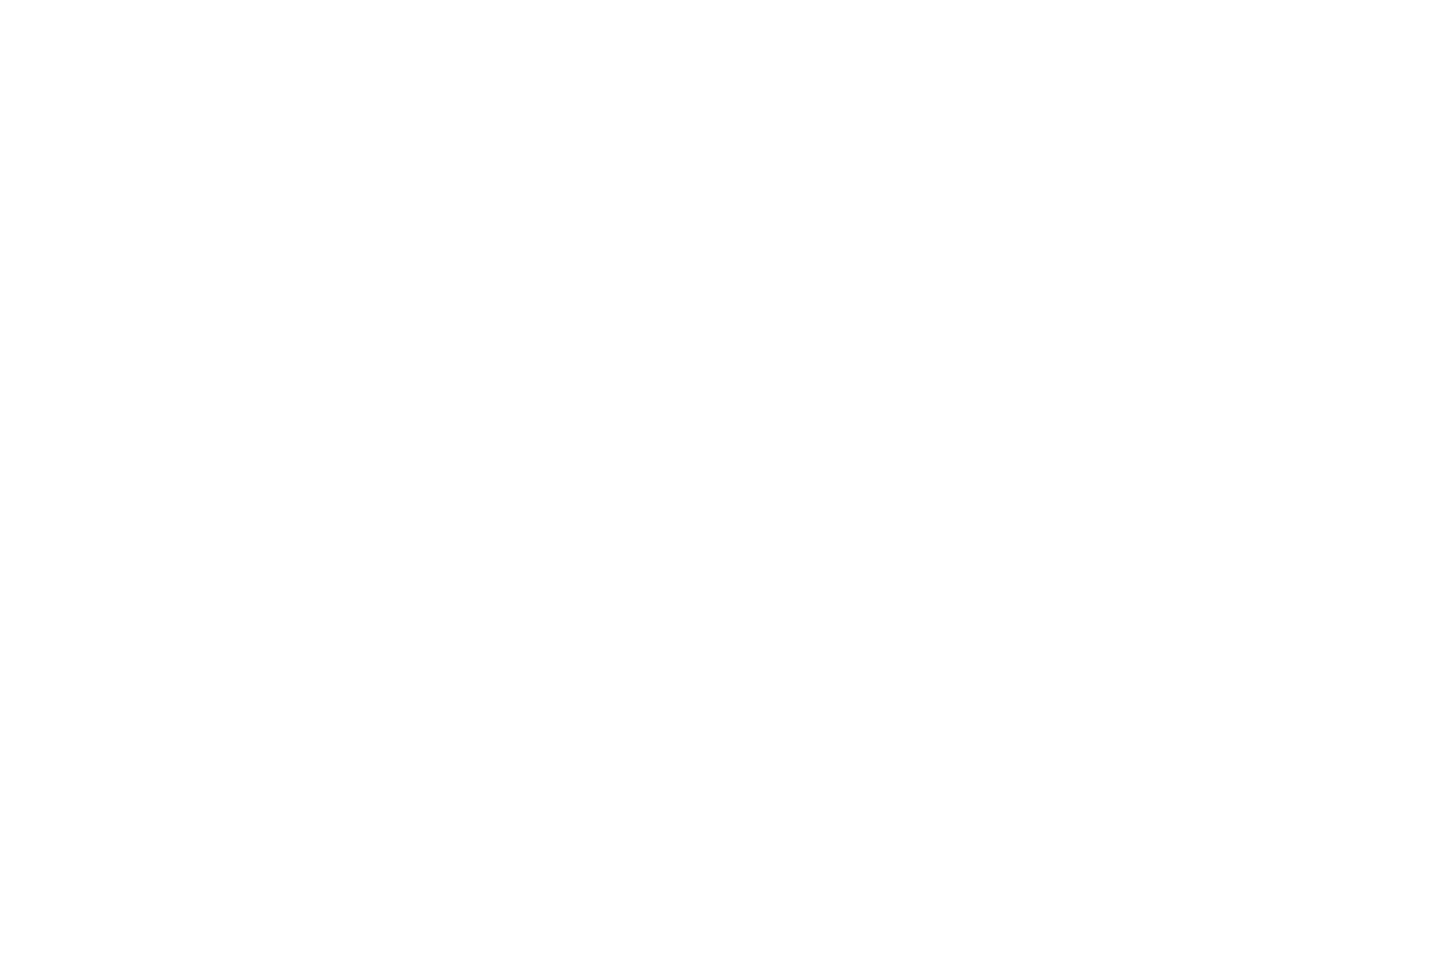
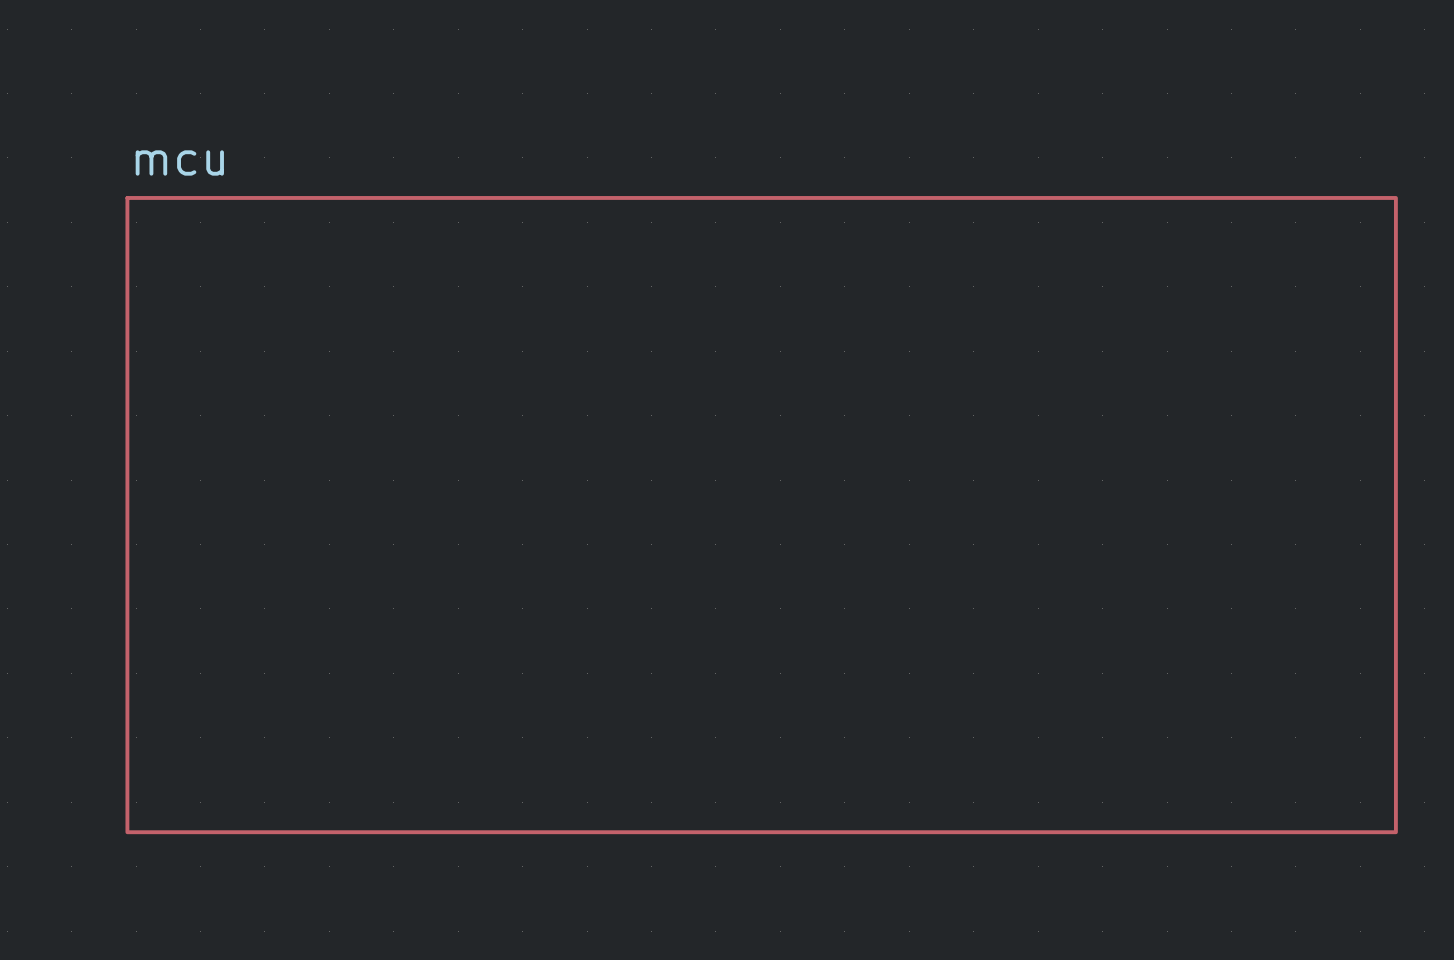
sheet mcu: none -> (761, 515)

